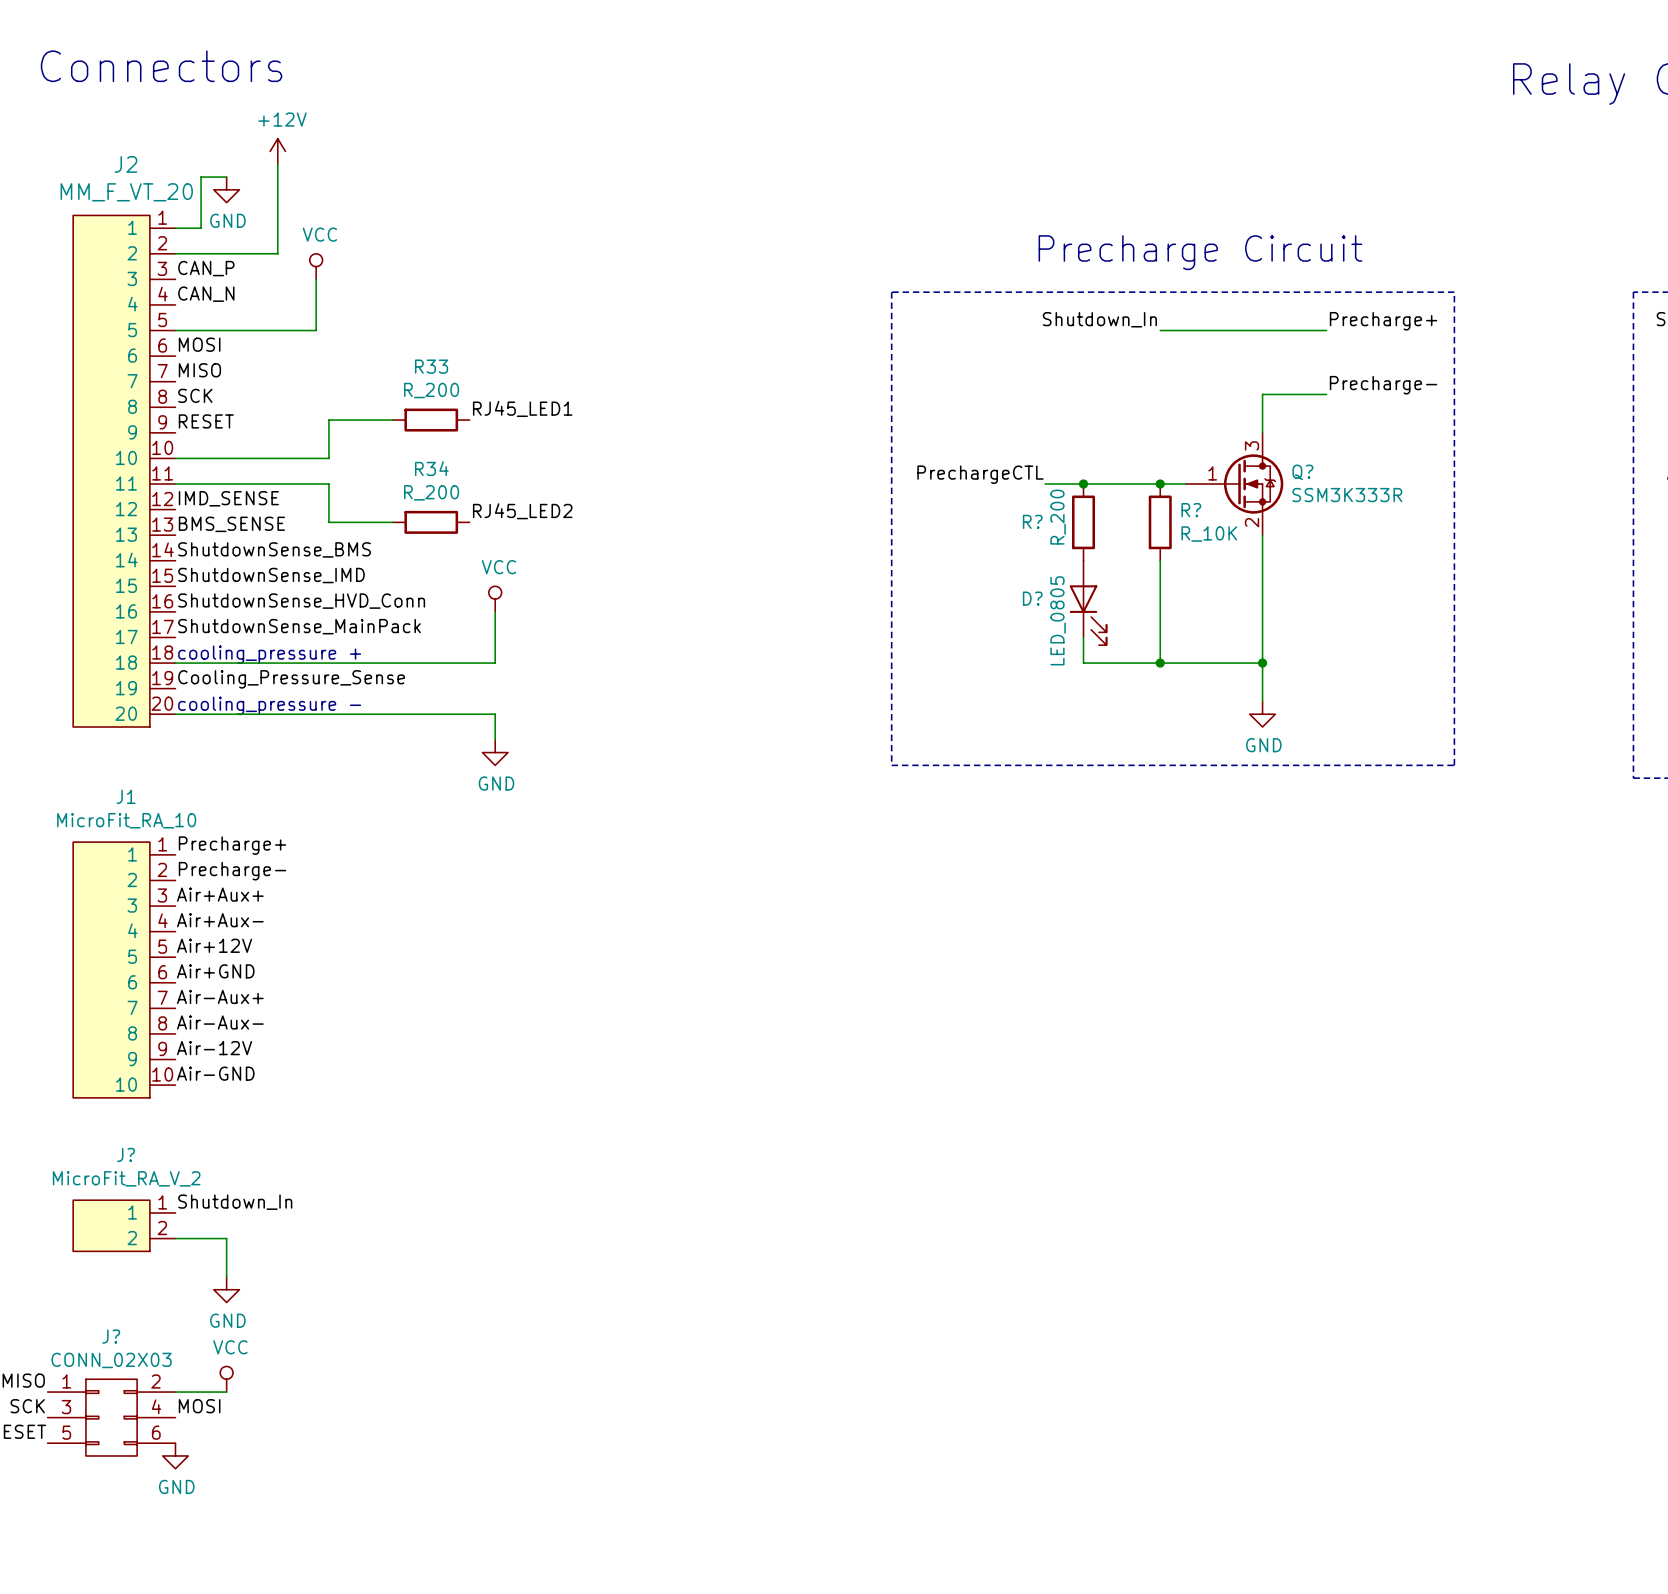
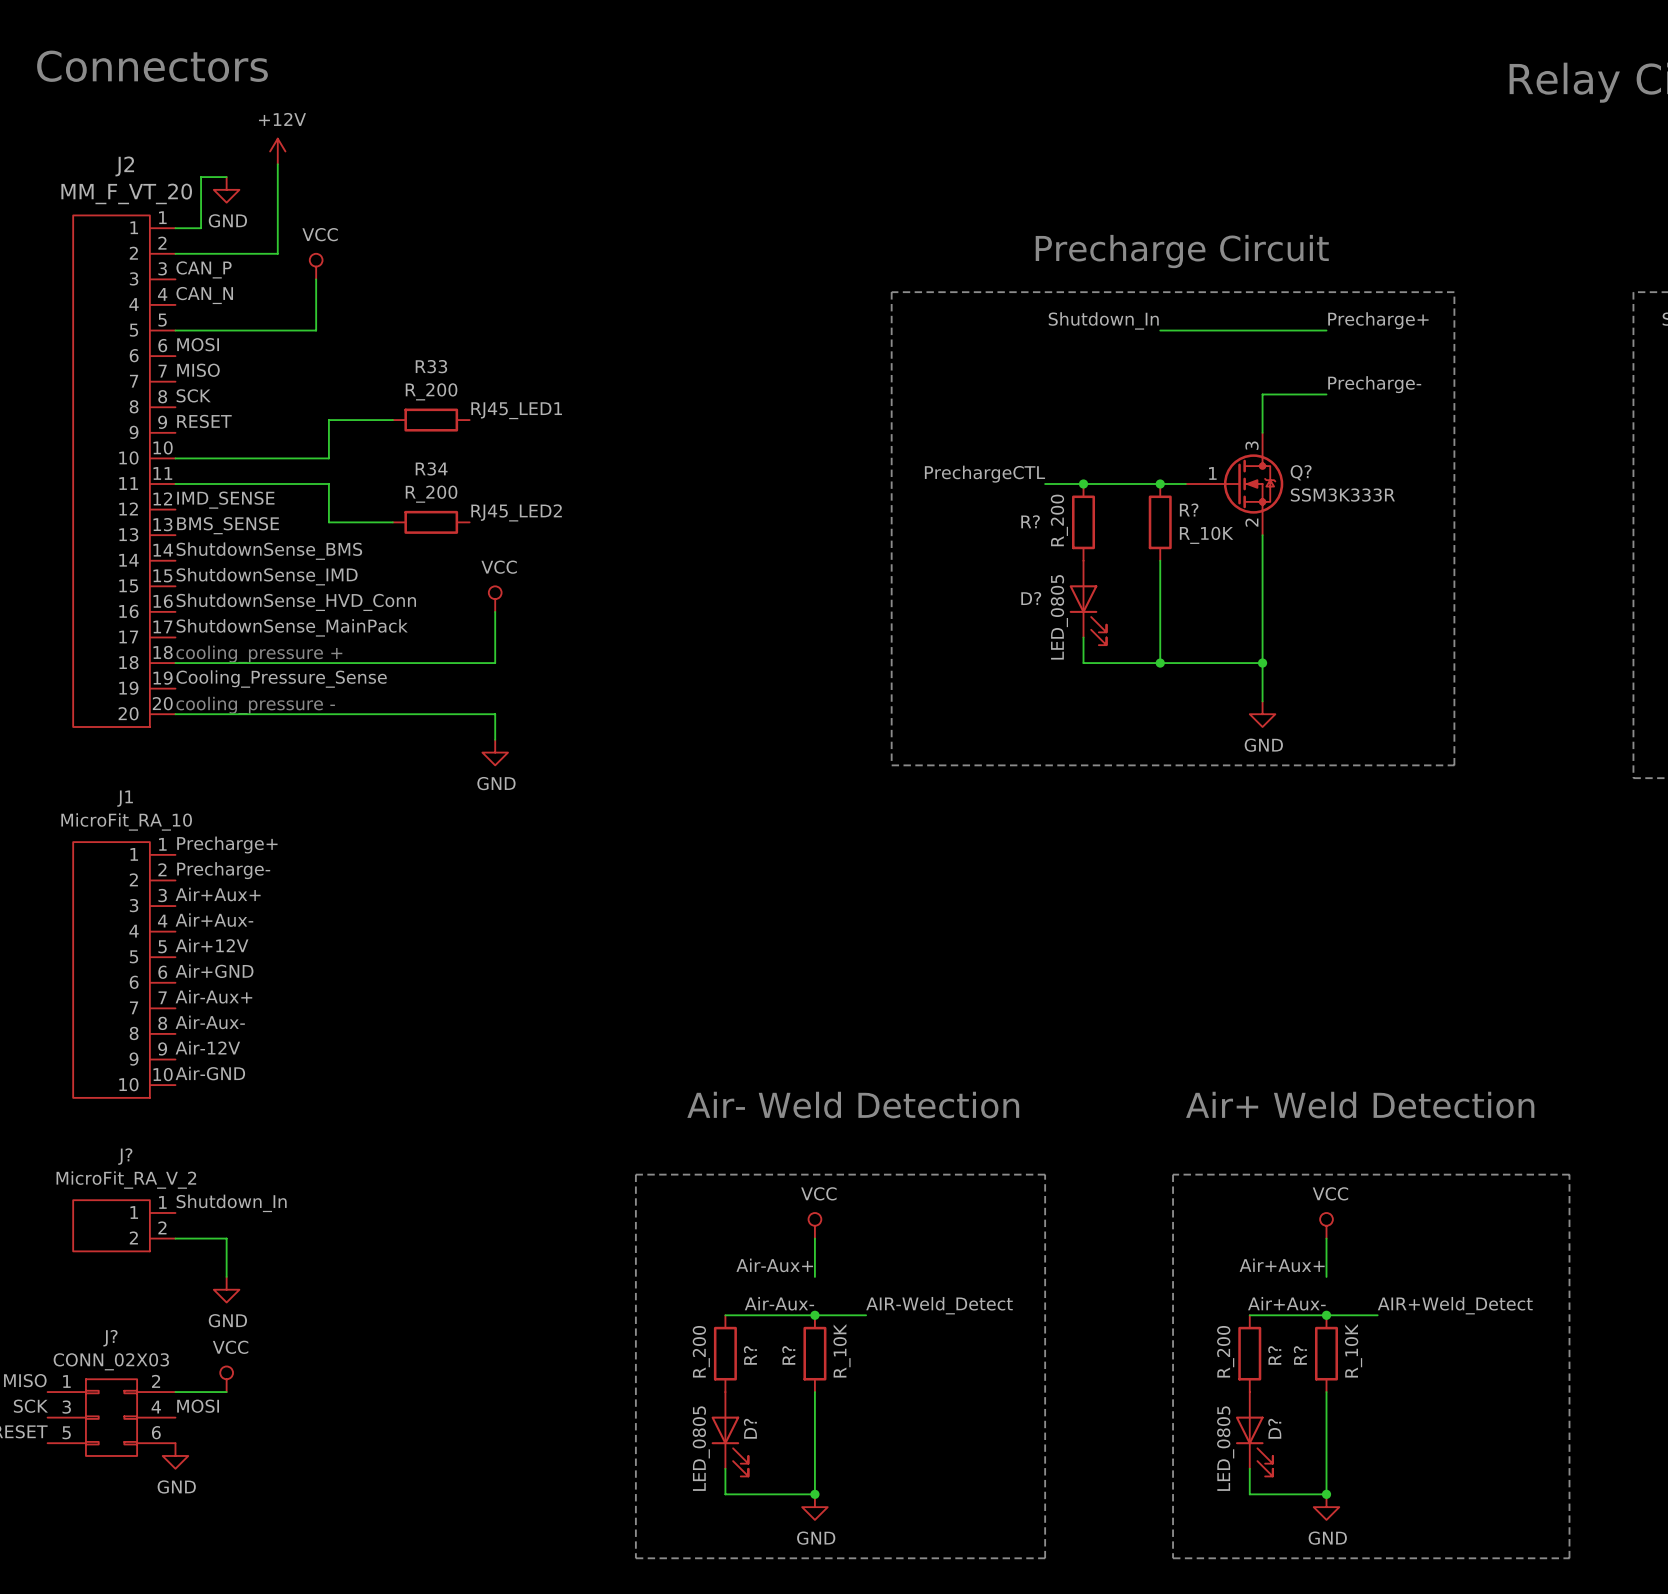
text: none -> Air- Weld Detection (853, 1105)
text: none -> Air+ Weld Detection (1360, 1105)
line: none -> (635, 1174) (635, 1558) (1045, 1558) (1045, 1174) (635, 1174)
line: none -> (1173, 1174) (1569, 1174) (1569, 1558) (1173, 1558) (1173, 1174)
power symbol: none -> VCC (814, 1225)
power symbol: none -> VCC (1326, 1225)
wire: none -> (814, 1238) (814, 1276)
wire: none -> (1326, 1238) (1326, 1276)
label: none -> Air-Aux+ (774, 1265)
label: none -> Air+Aux+ (1282, 1265)
label: none -> Air-Aux- (779, 1303)
label: none -> Air+Aux- (1286, 1303)
label: none -> AIR-Weld_Detect (939, 1305)
label: none -> AIR+Weld_Detect (1455, 1305)
wire: none -> (725, 1315) (866, 1315)
junction: none -> (814, 1315)
wire: none -> (1249, 1315) (1377, 1315)
junction: none -> (1326, 1315)
R?: none -> R_200 (725, 1353)
R?: none -> R_10K (814, 1353)
R?: none -> R_200 (1249, 1353)
R?: none -> R_10K (1326, 1353)
wire: none -> (814, 1392) (814, 1494) (725, 1494) (725, 1468)
wire: none -> (1326, 1392) (1326, 1494) (1249, 1494) (1249, 1468)
D?: none -> LED_0805 (730, 1434)
D?: none -> LED_0805 (1254, 1434)
junction: none -> (814, 1494)
junction: none -> (1326, 1494)
power symbol: none -> GND (814, 1507)
power symbol: none -> GND (1326, 1507)

